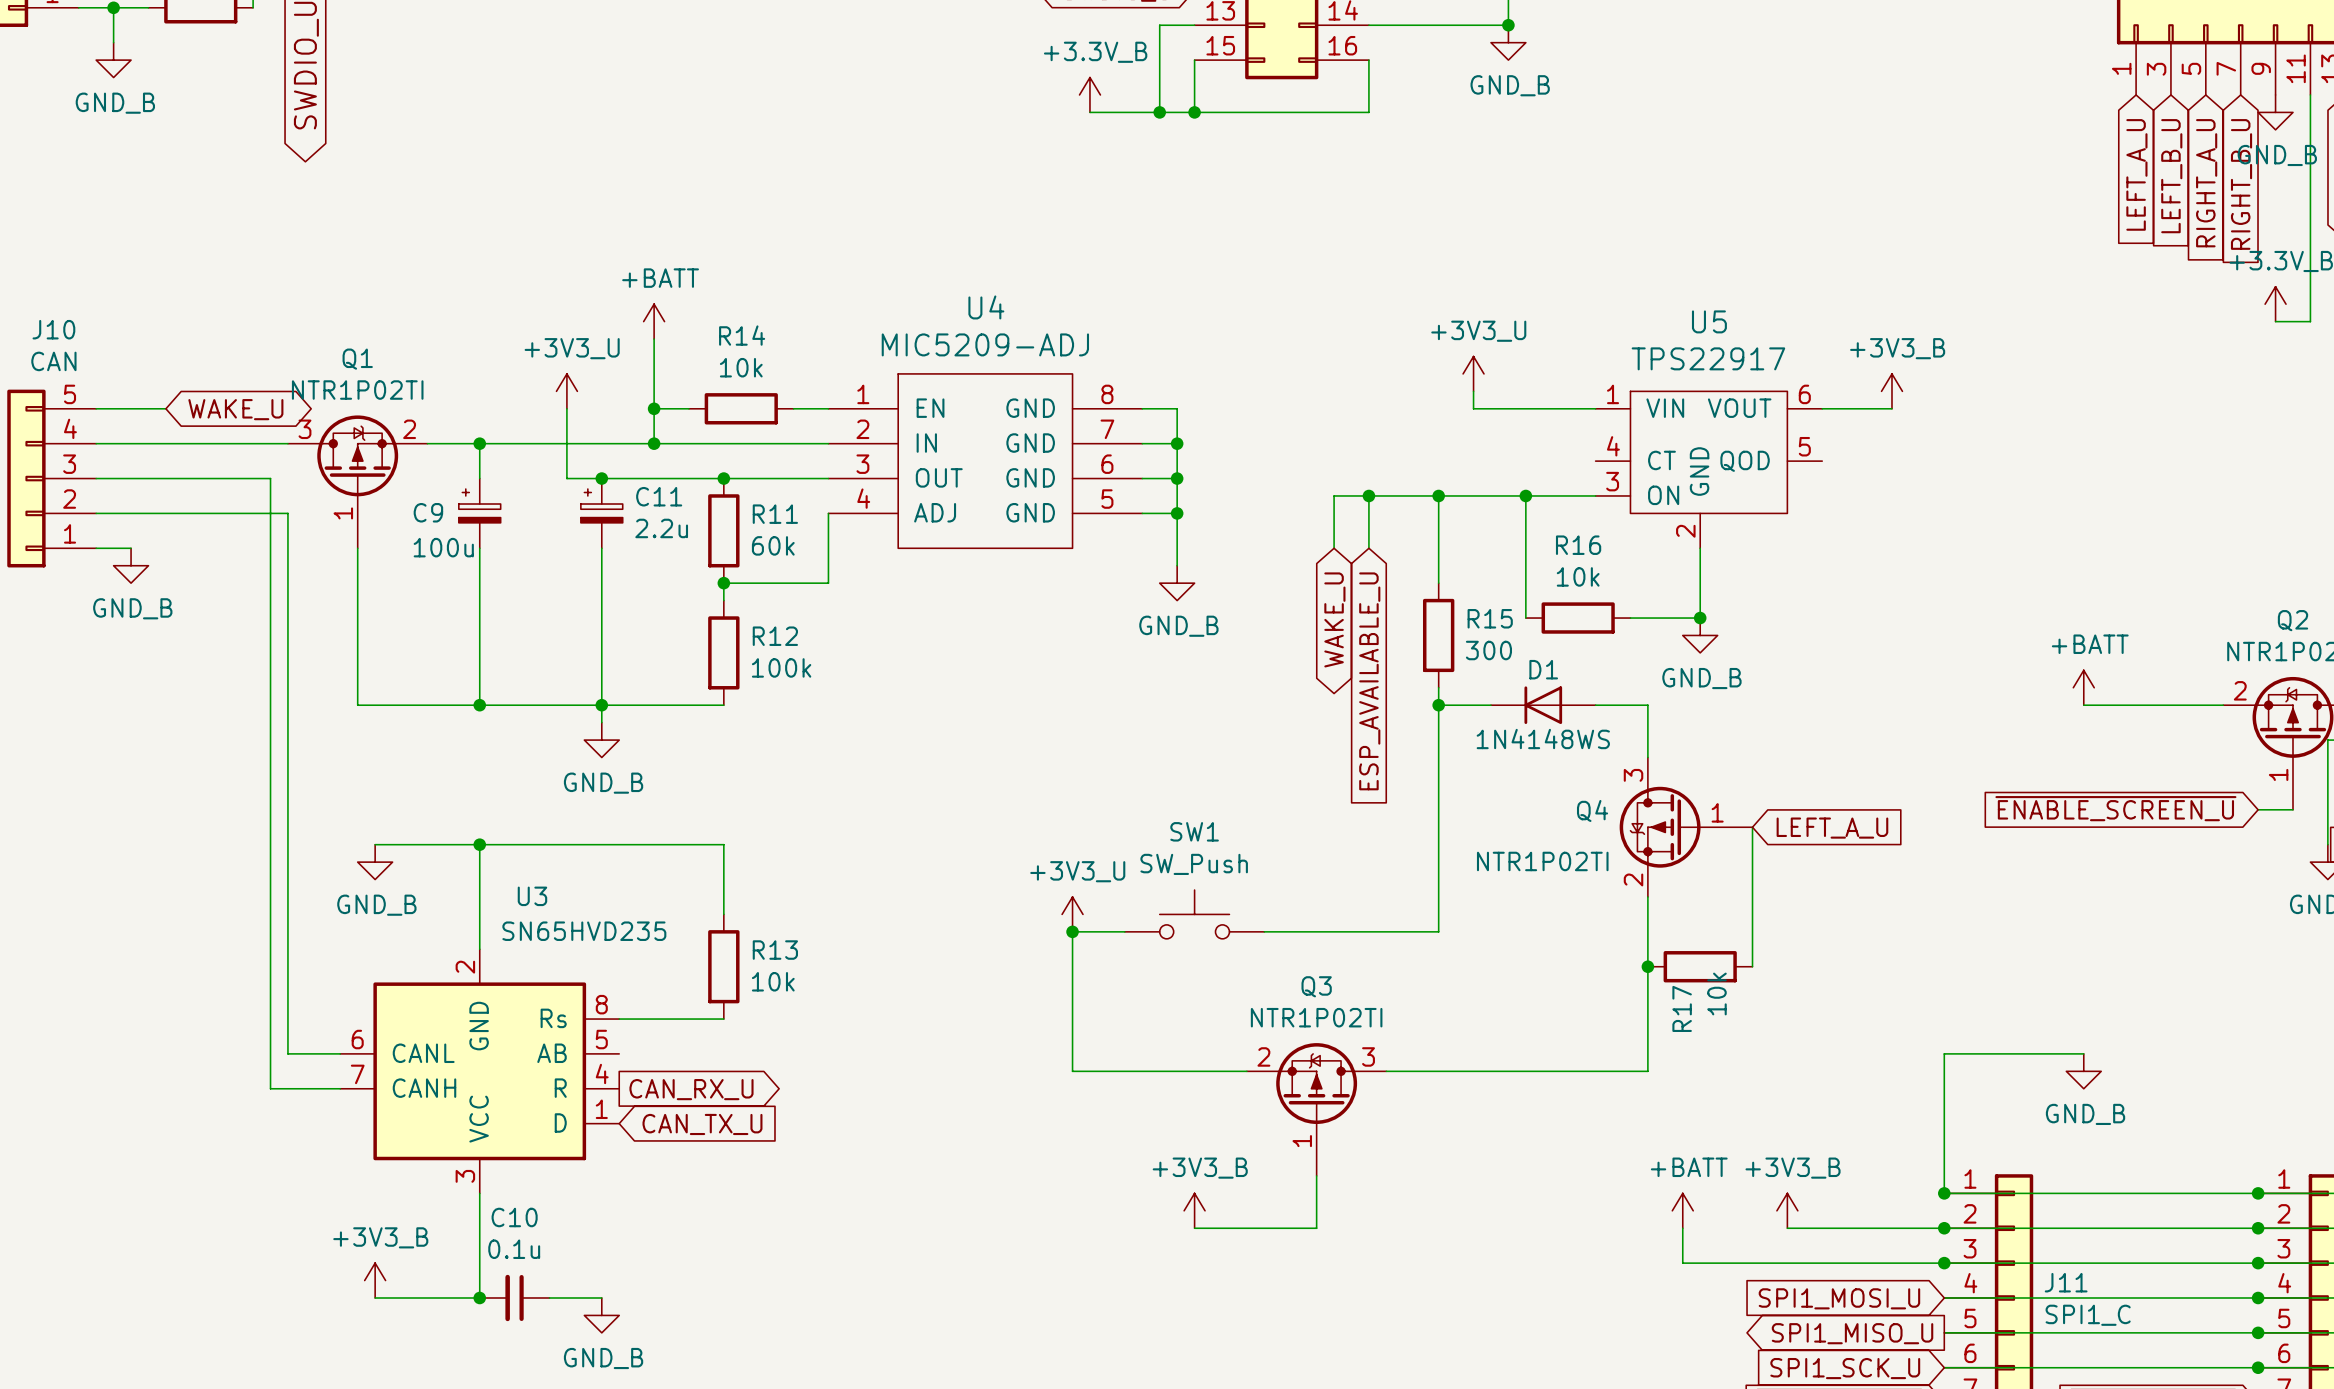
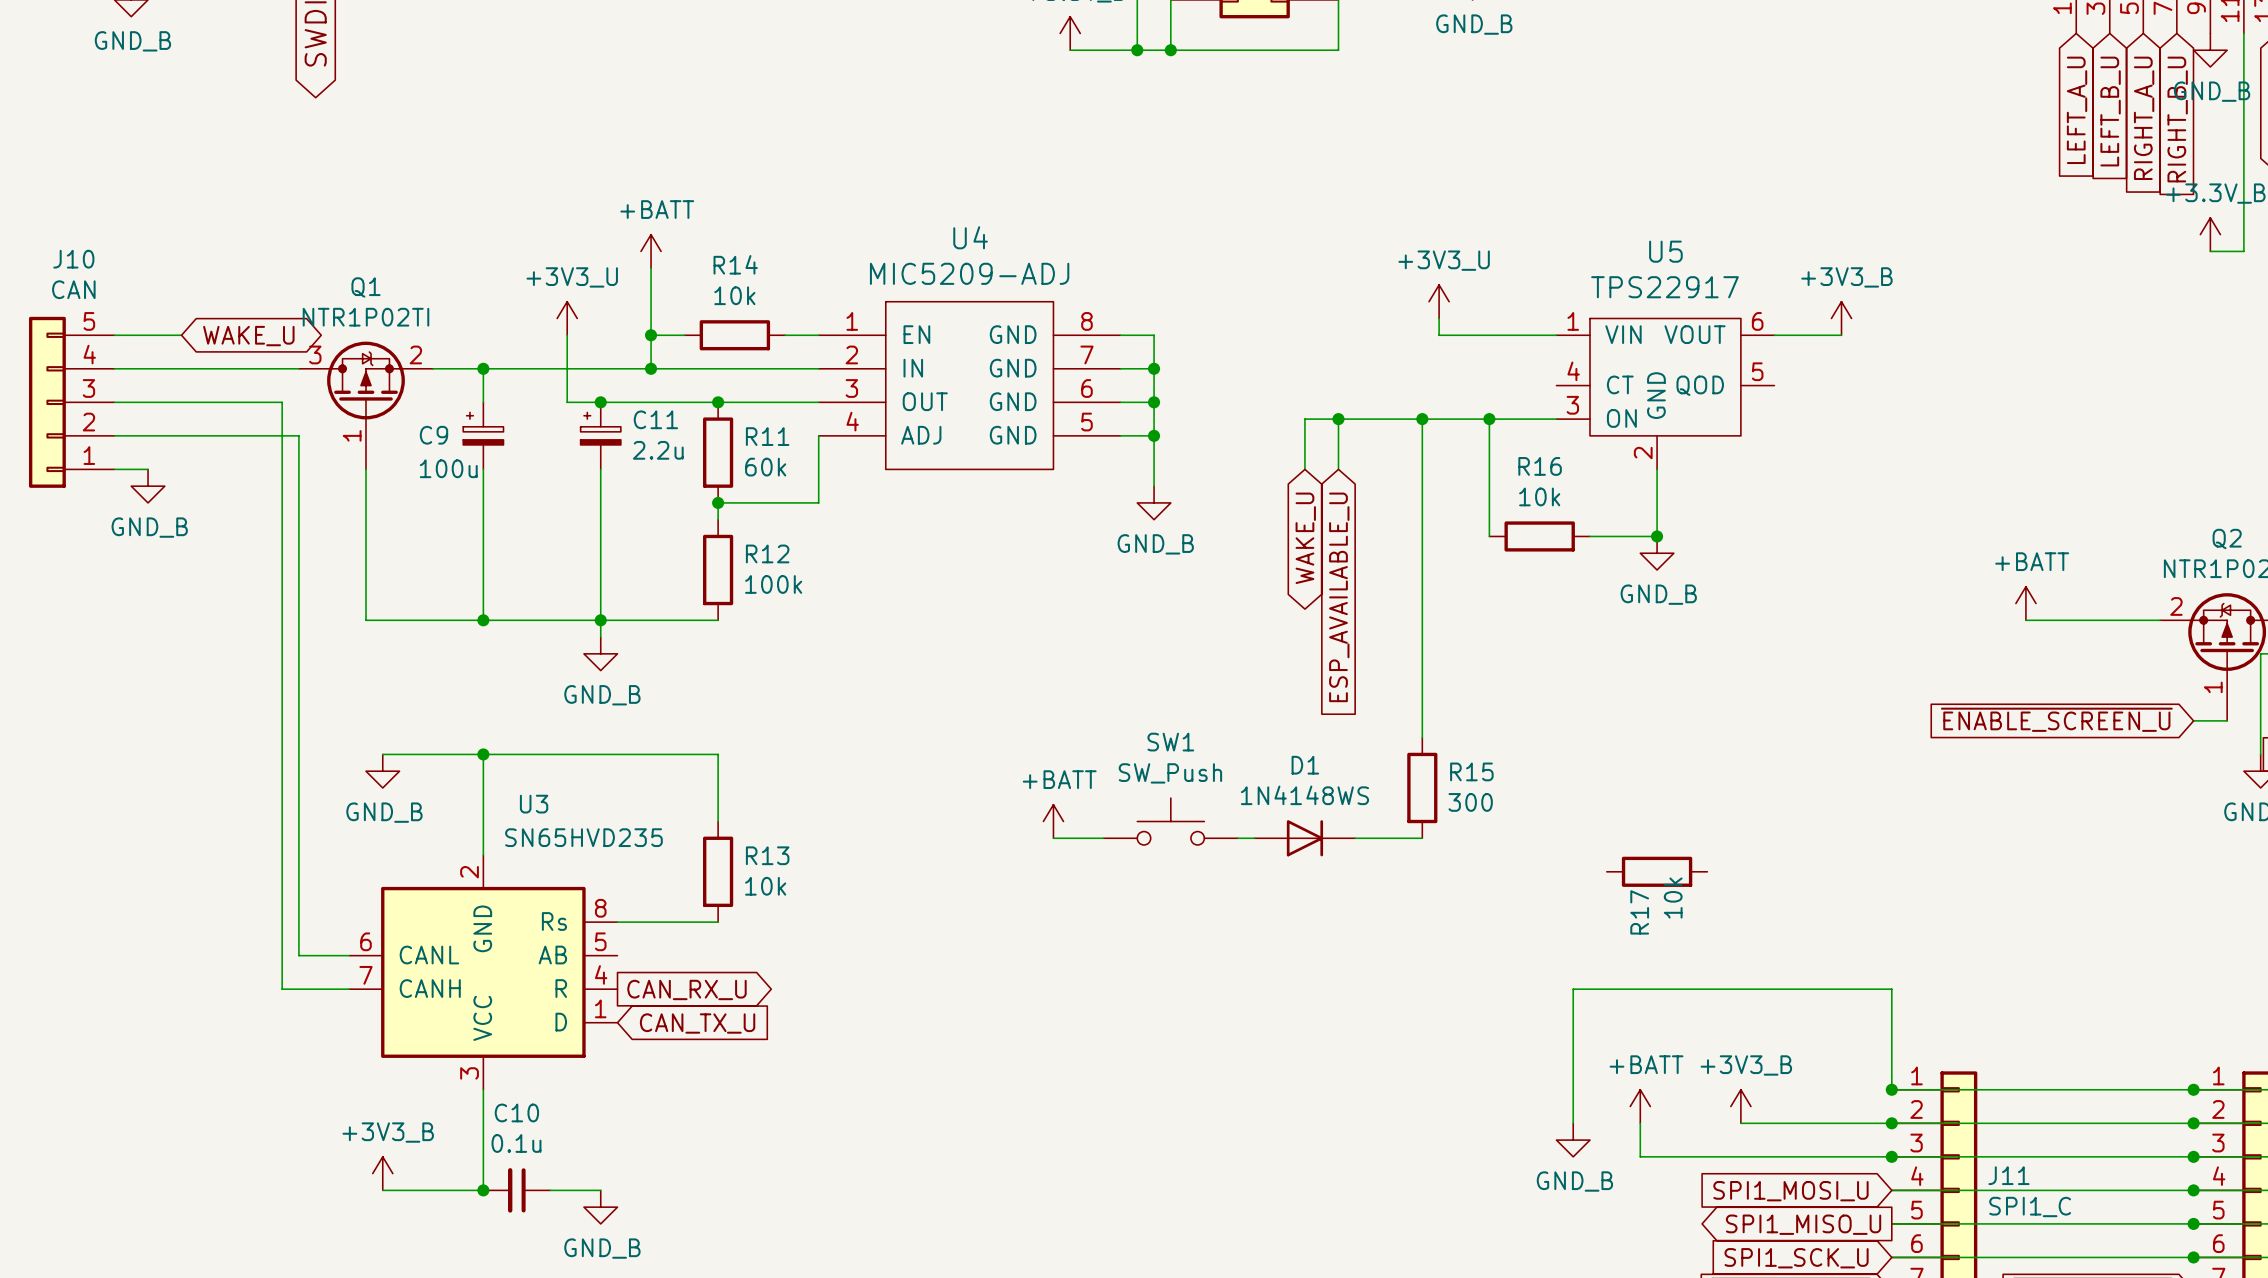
wire: (1438, 495) (1438, 583) -> none
junction position: (1438, 495) -> (1422, 419)
wire: none -> (1422, 419) (1422, 737)
R15 position: (1438, 635) -> (1422, 787)
D1 name position: D1 (1543, 669) -> D1 (1305, 765)
wire: (1438, 687) (1438, 931) -> (1422, 838) (1405, 838)
wire: (1438, 705) (1490, 705) -> none
junction: (1438, 705) -> none
D1 rotation: 0° (1543, 705) -> 180° (1304, 838)
D1 position: (1543, 705) -> (1304, 838)
wire: (1595, 705) (1647, 705) (1647, 757) -> none
Q4: NTR1P02TI (1686, 827) -> none
wire: (1752, 827) (1752, 966) -> none
global label: LEFT_A_U (1832, 828) -> none
wire: (1647, 896) (1647, 1071) (1386, 1071) -> none
power symbol: +3V3_U (1072, 914) -> +BATT (1053, 821)
wire: (1072, 931) (1072, 1071) (1246, 1071) -> none
junction: (1072, 931) -> none
junction: (1647, 966) -> none
wire: (2083, 1053) (1944, 1053) (1944, 1088) -> (1573, 1123) (1573, 989) (1891, 989)
power symbol: GND_B (2083, 1071) -> none
Q3: NTR1P02TI (1316, 1109) -> none
wire: (1316, 1175) (1316, 1228) (1194, 1228) -> none
power symbol: +3V3_B (1194, 1210) -> none
power symbol: none -> GND_B (1573, 1140)

